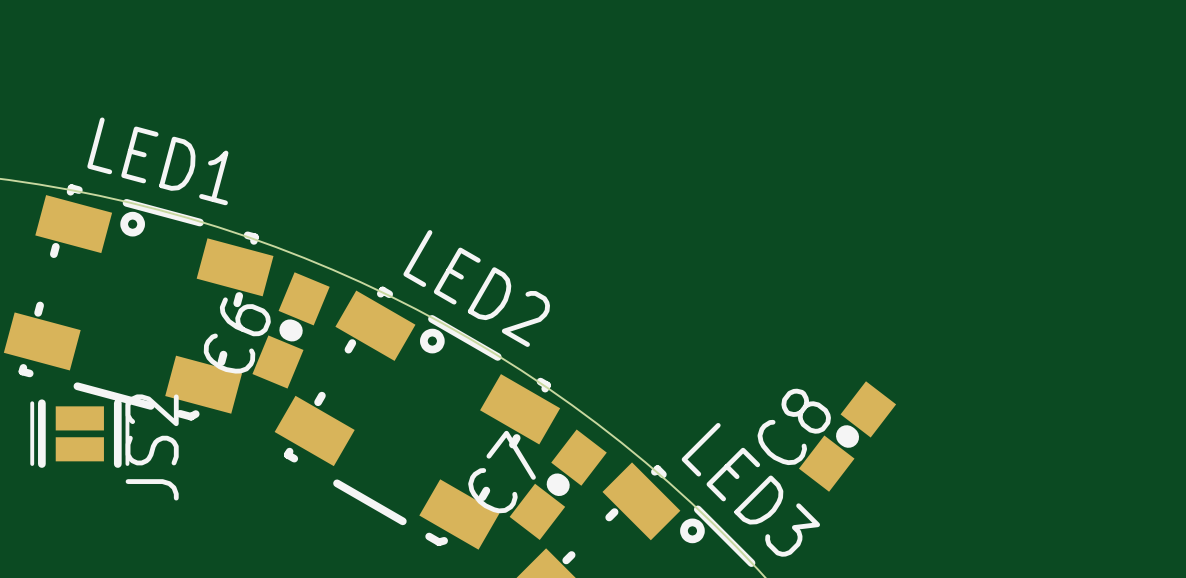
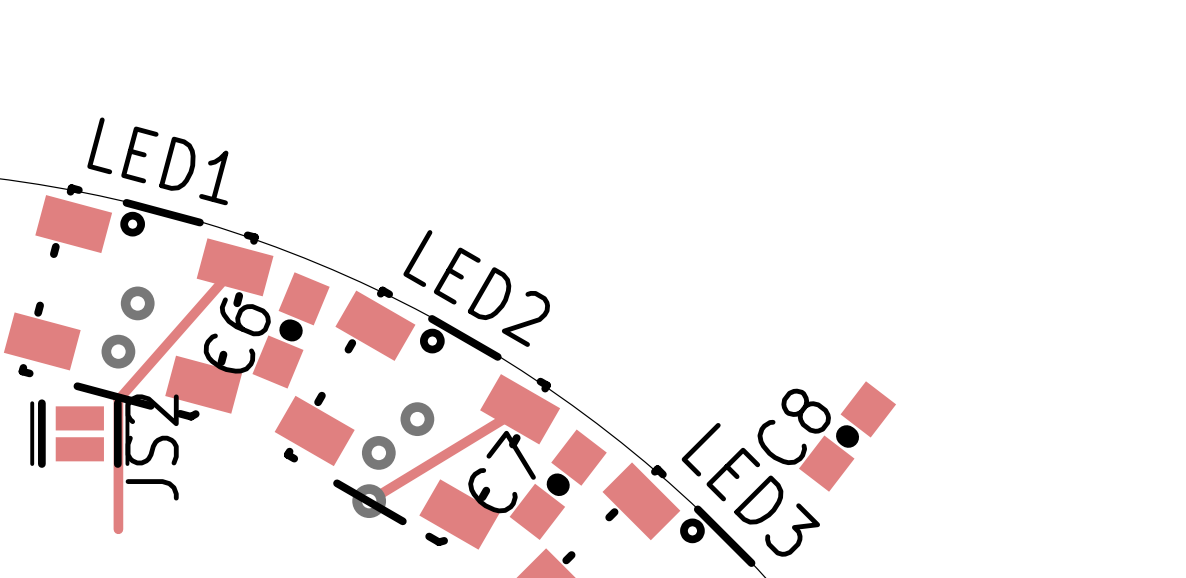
track: none -> (235, 267) (118, 399) (118, 529)
via: none -> (137, 303)
via: none -> (118, 351)
track: none -> (520, 409) (369, 501)
via: none -> (417, 419)
via: none -> (378, 452)
via: none -> (369, 501)

